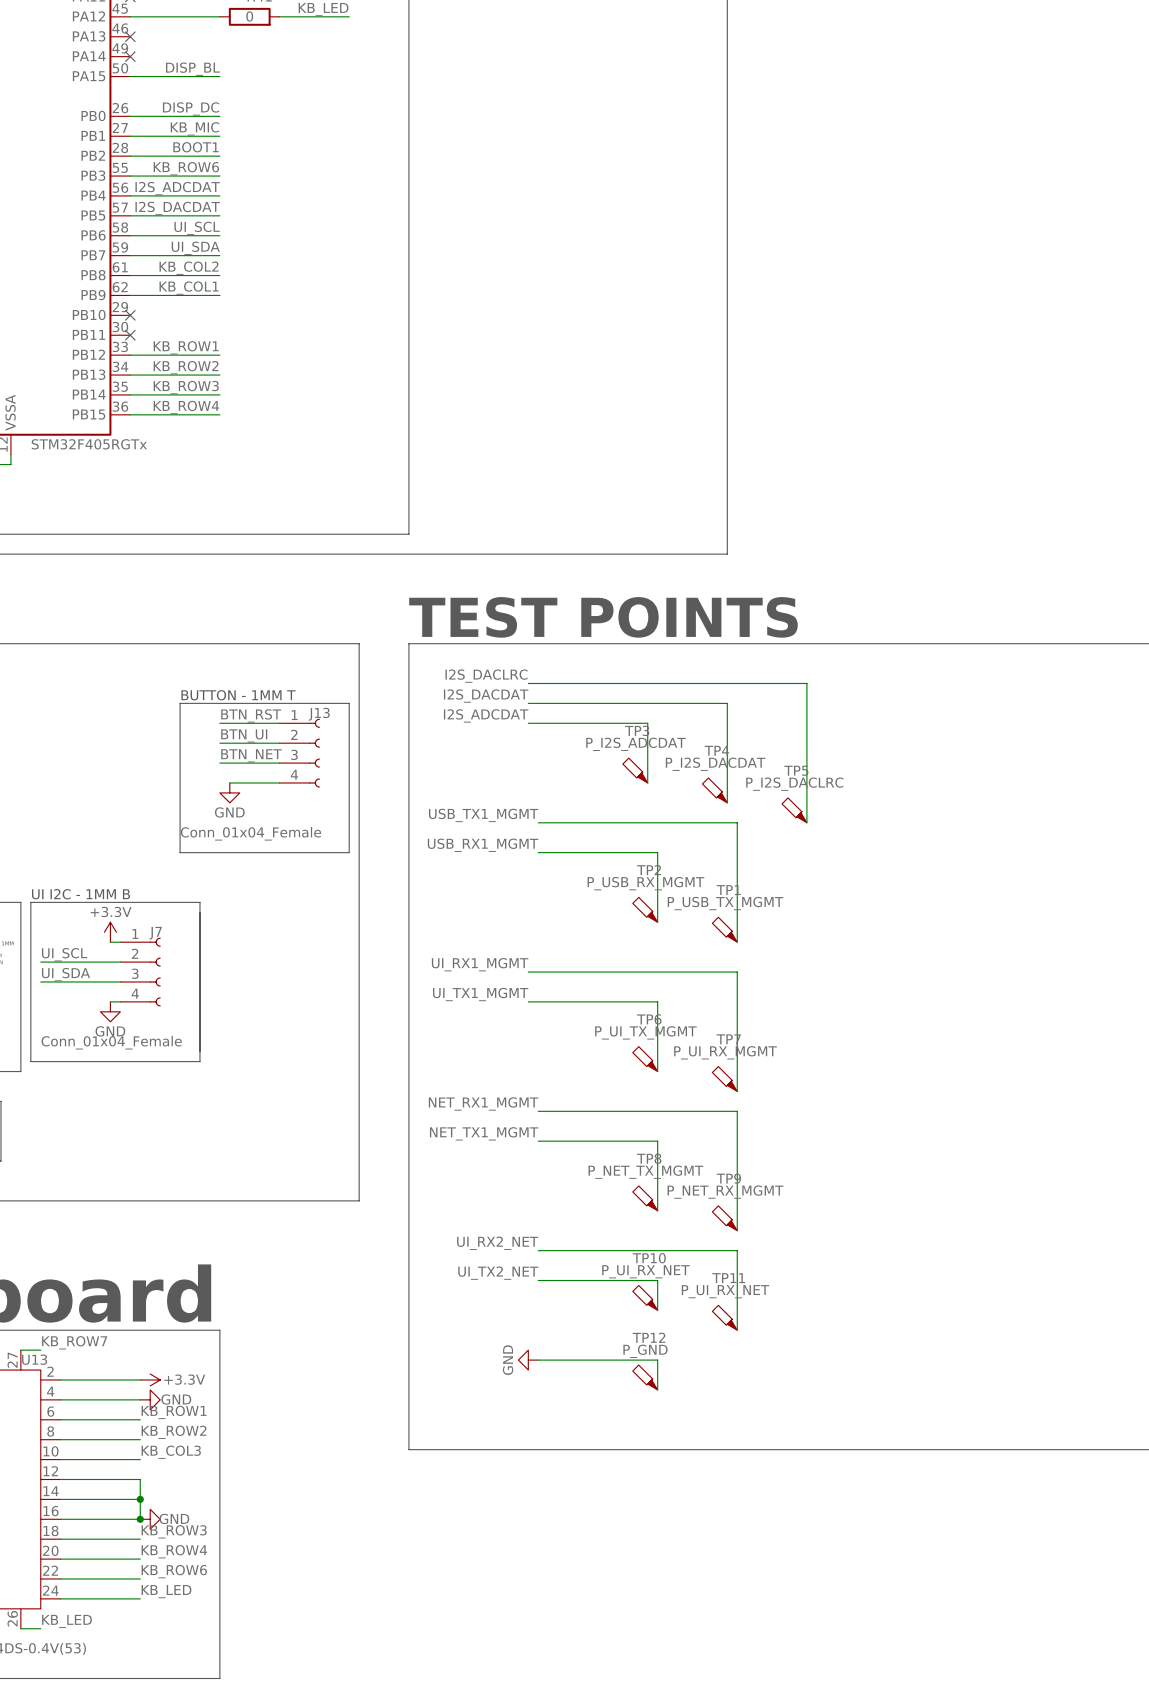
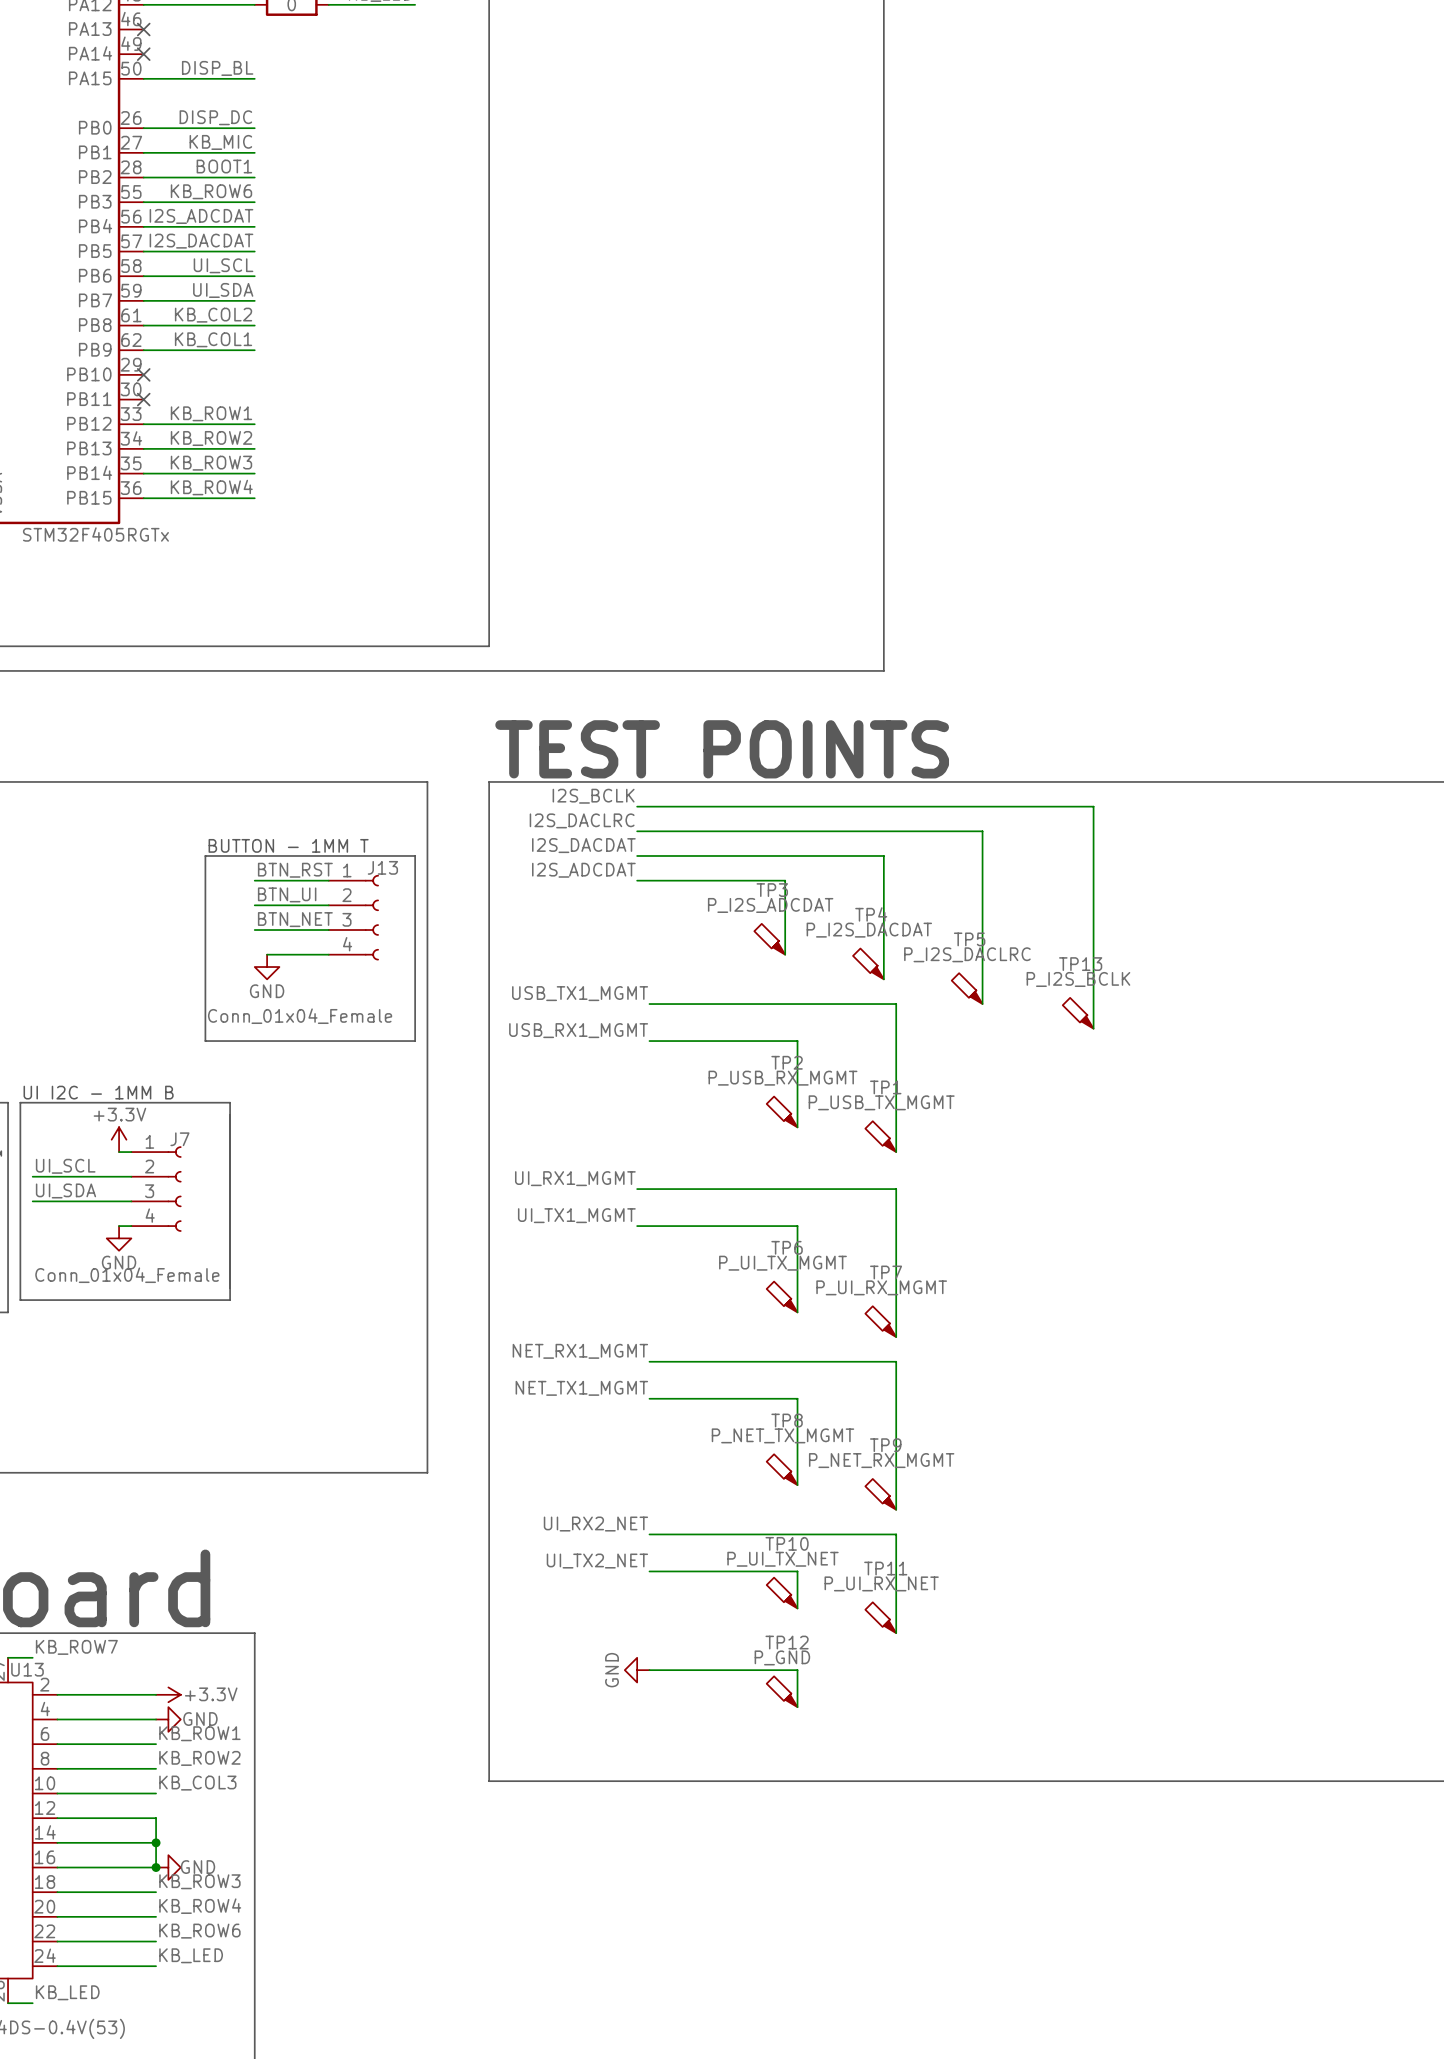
label: none -> I2S_BCLK (593, 796)
wire: none -> (637, 806) (1093, 806) (1093, 1028)
TP13: none -> P_I2S_BCLK (1078, 1013)
TP10 value: P_UI_RX_NET (645, 1271) -> P_UI_TX_NET (782, 1559)

